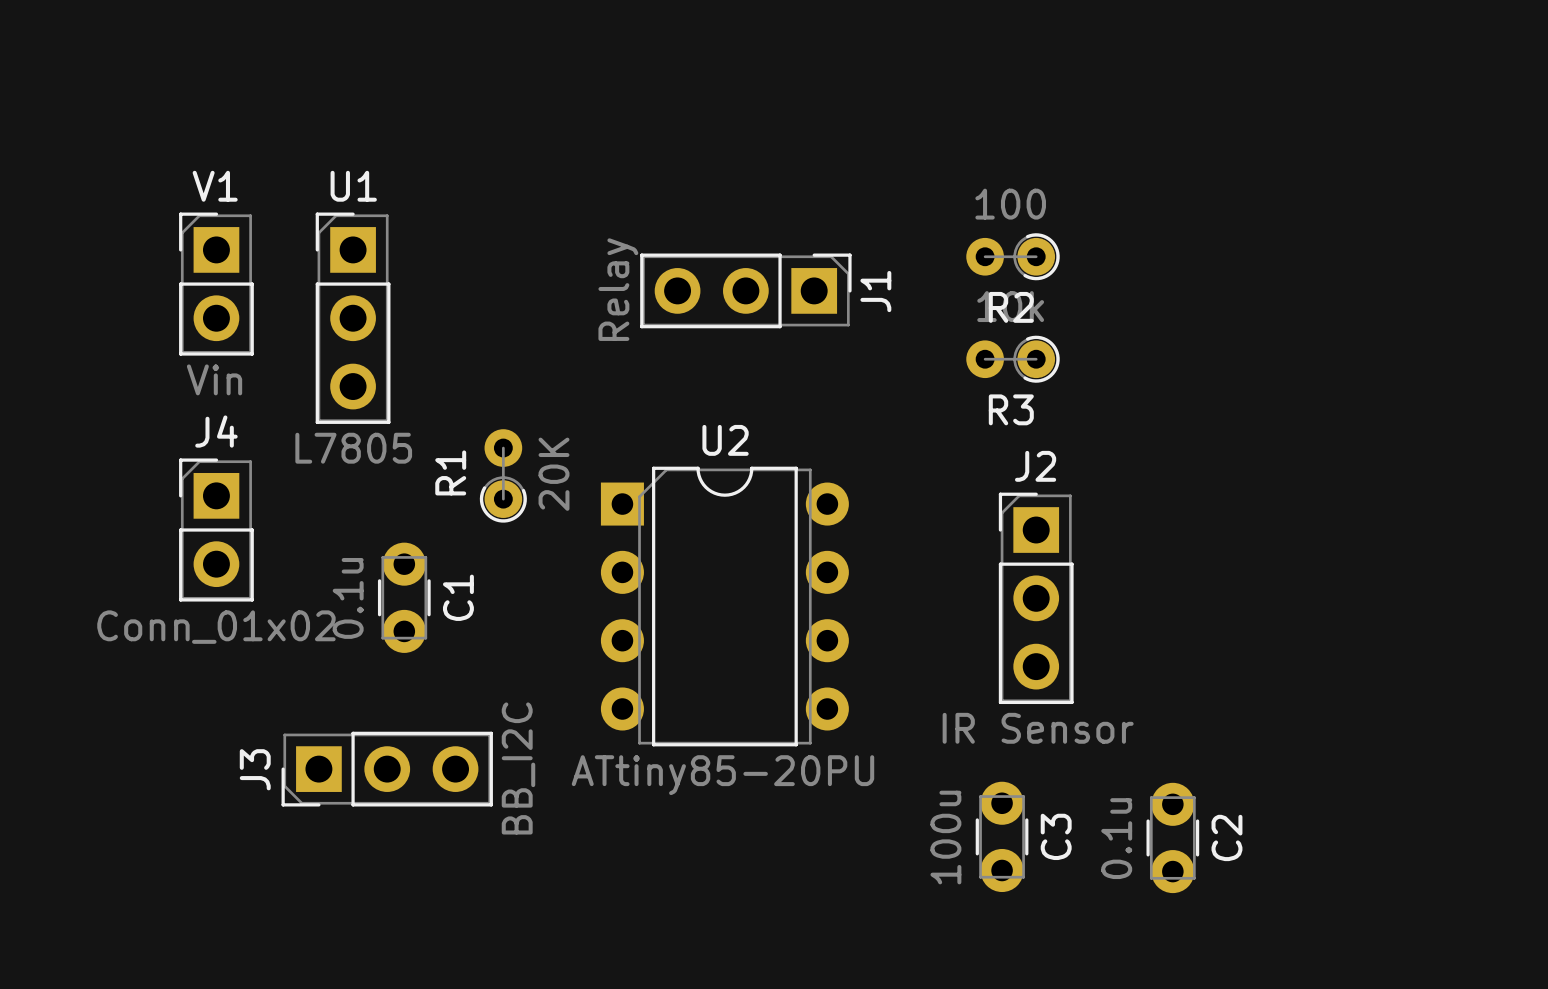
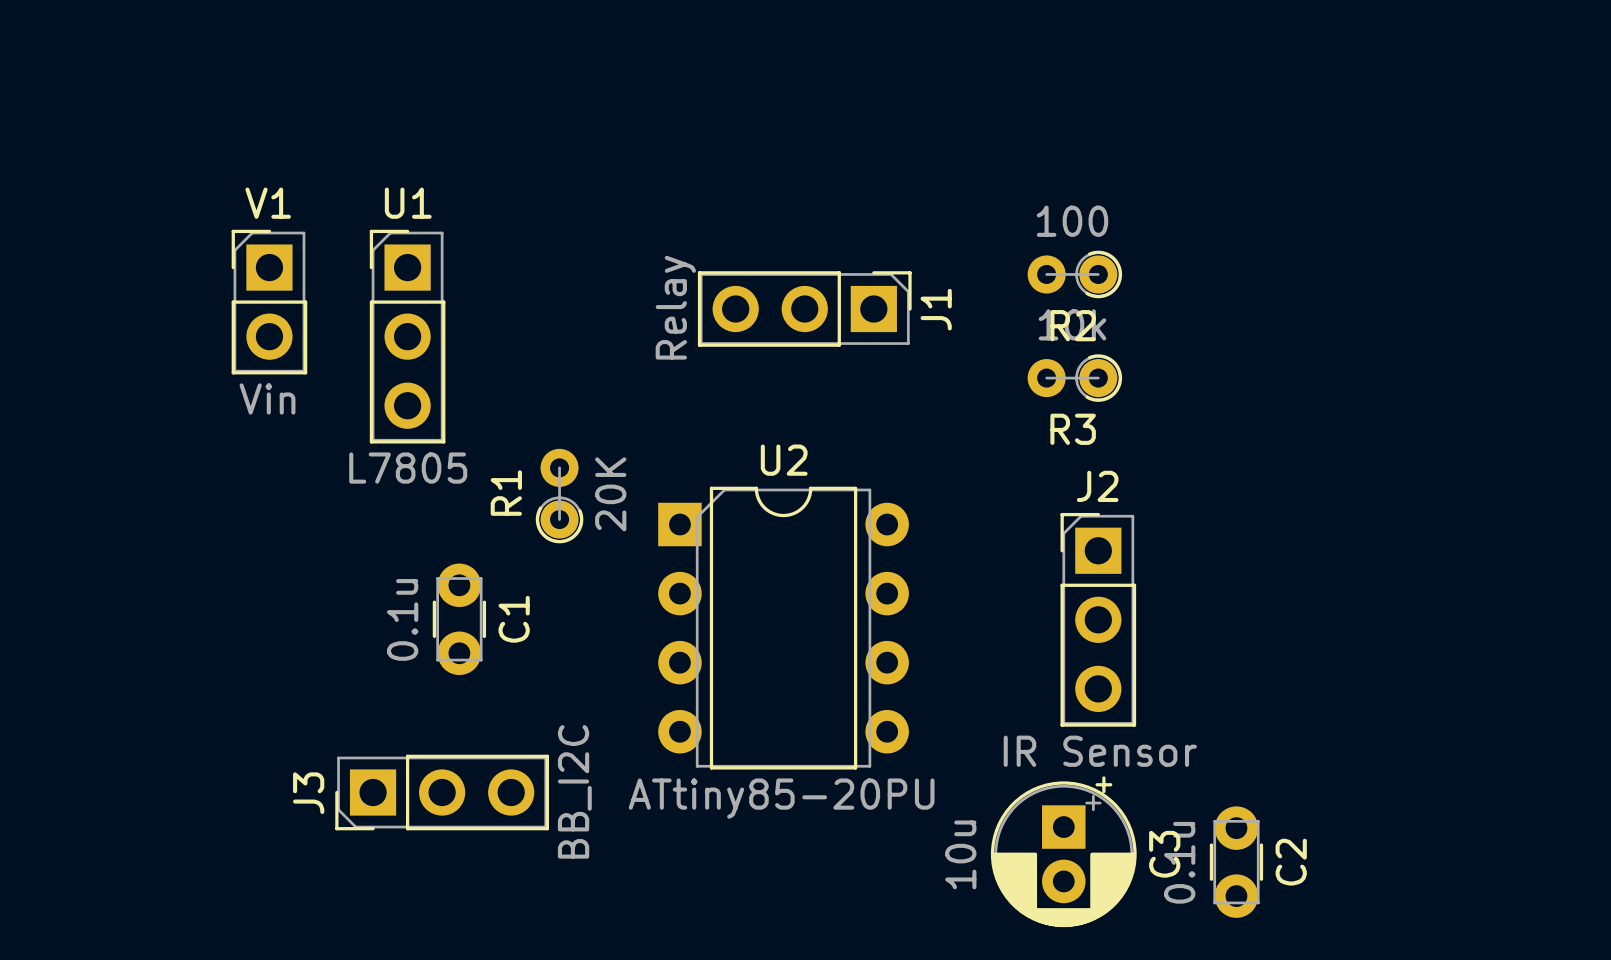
J4: Conn_01x02 (216, 530) -> none
C3 footprint: [975, 781, 1029, 893] -> [990, 776, 1137, 928]
C3 value: 100u (945, 837) -> 10u (960, 854)

